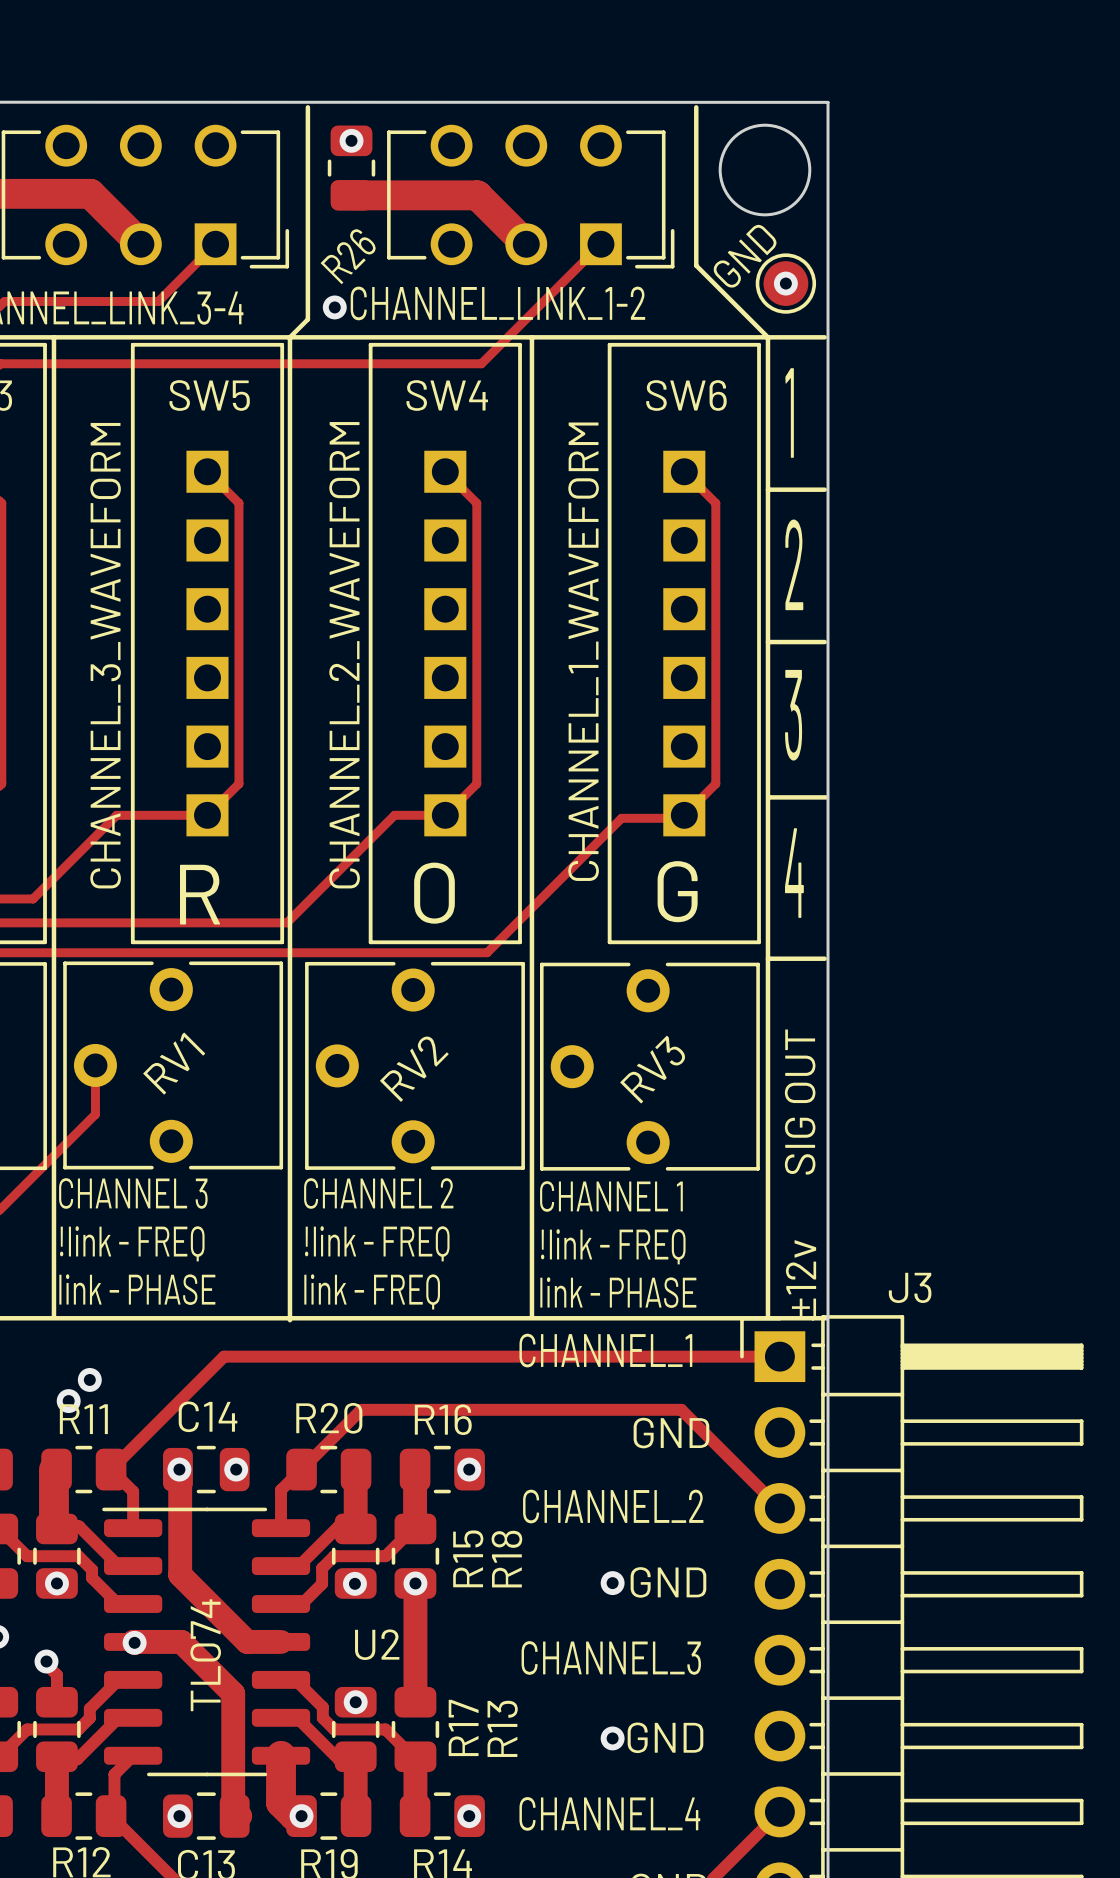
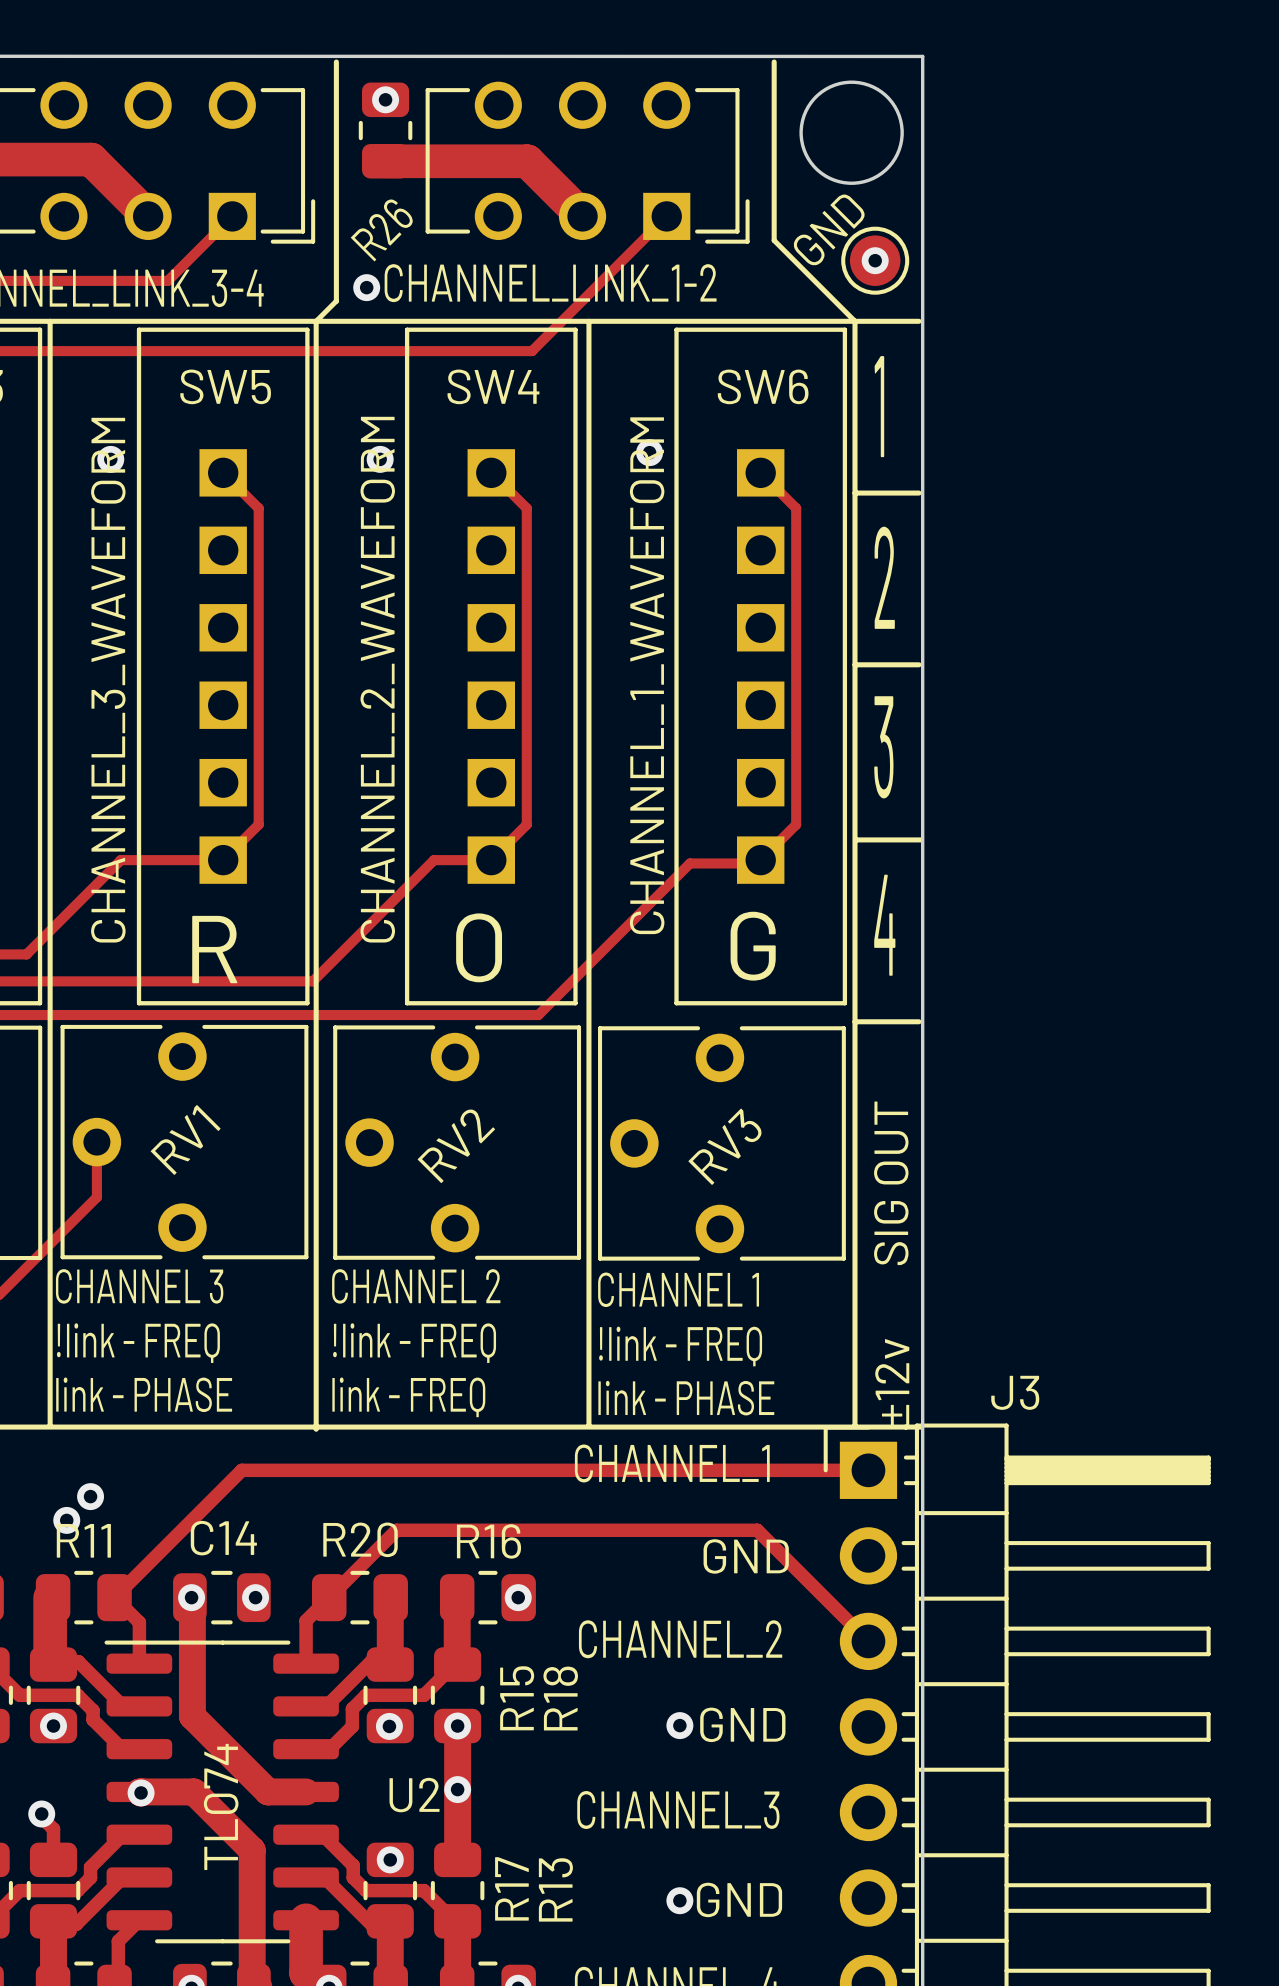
via: none -> (649, 452)
via: none -> (110, 459)
via: none -> (380, 459)
via: none -> (457, 1789)

